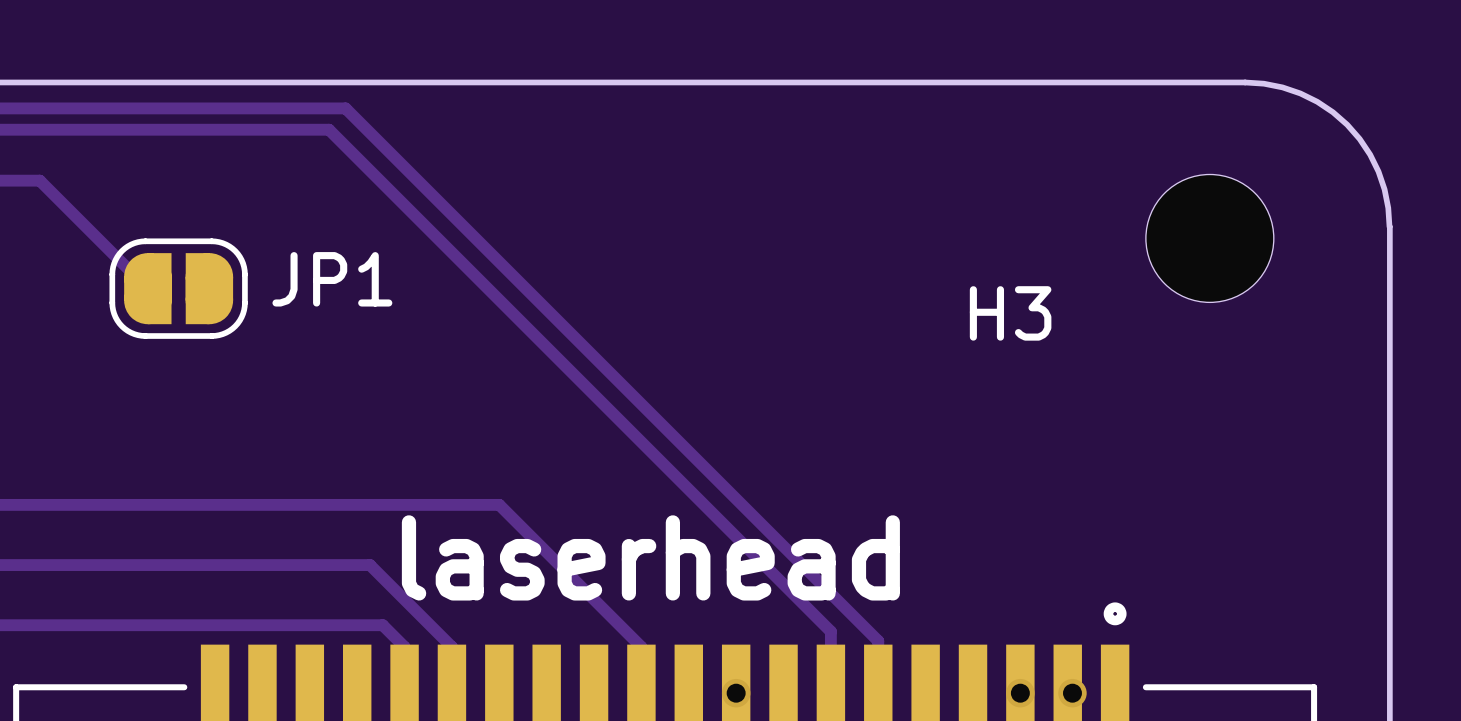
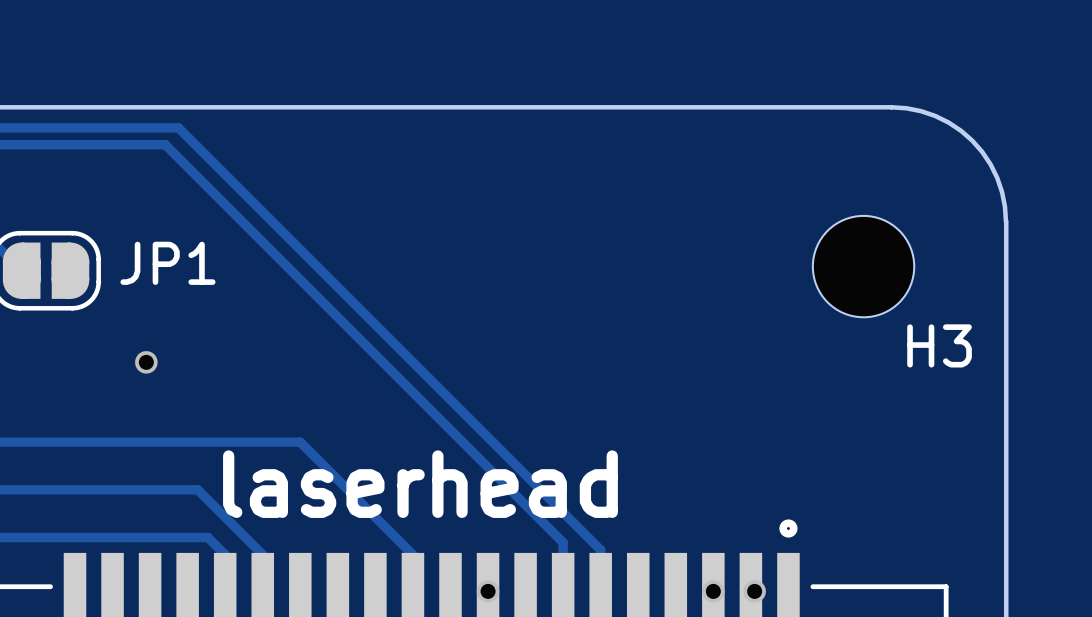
H3 position: (1209, 238) -> (863, 266)
H3 name position: H3 (1010, 313) -> H3 (939, 345)
via: none -> (146, 362)

